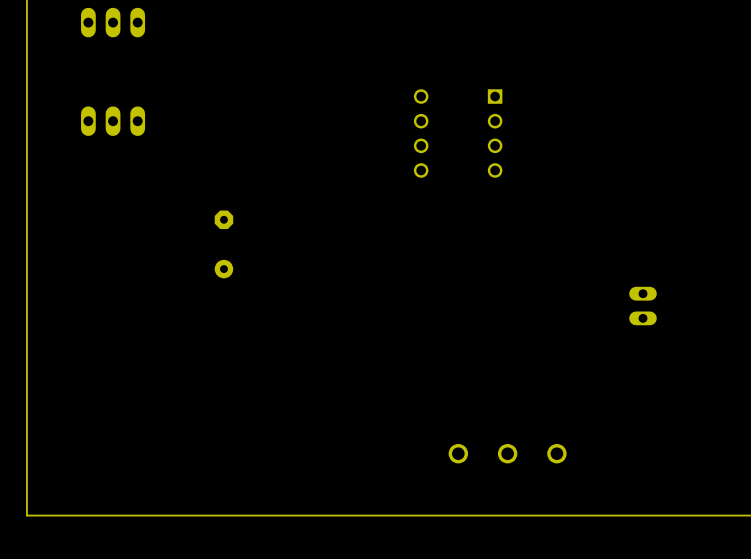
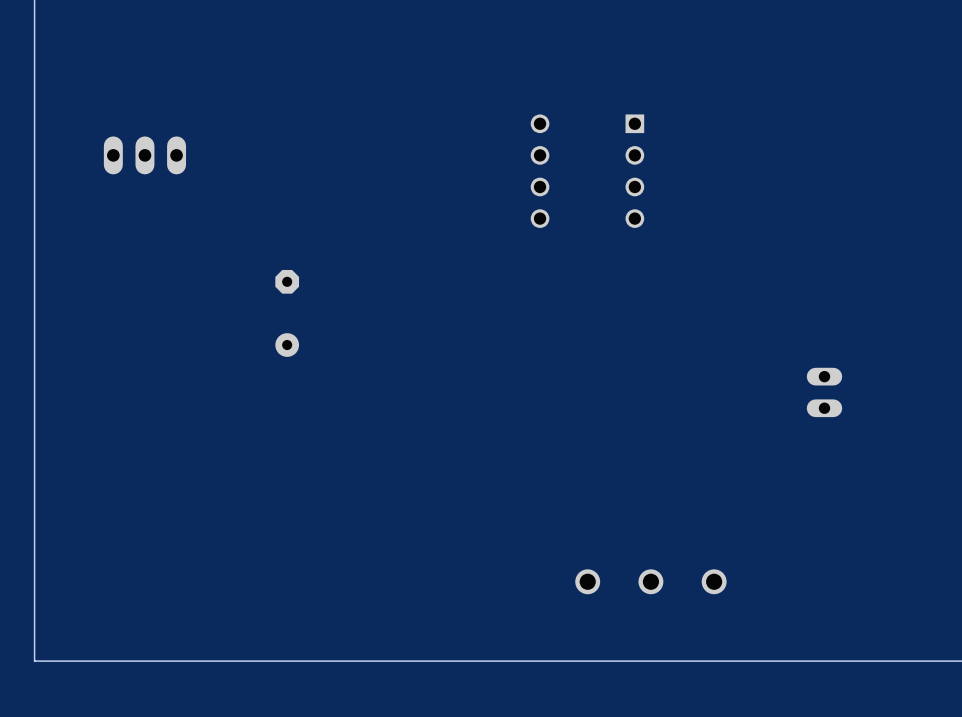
part: (113, 22) -> none

